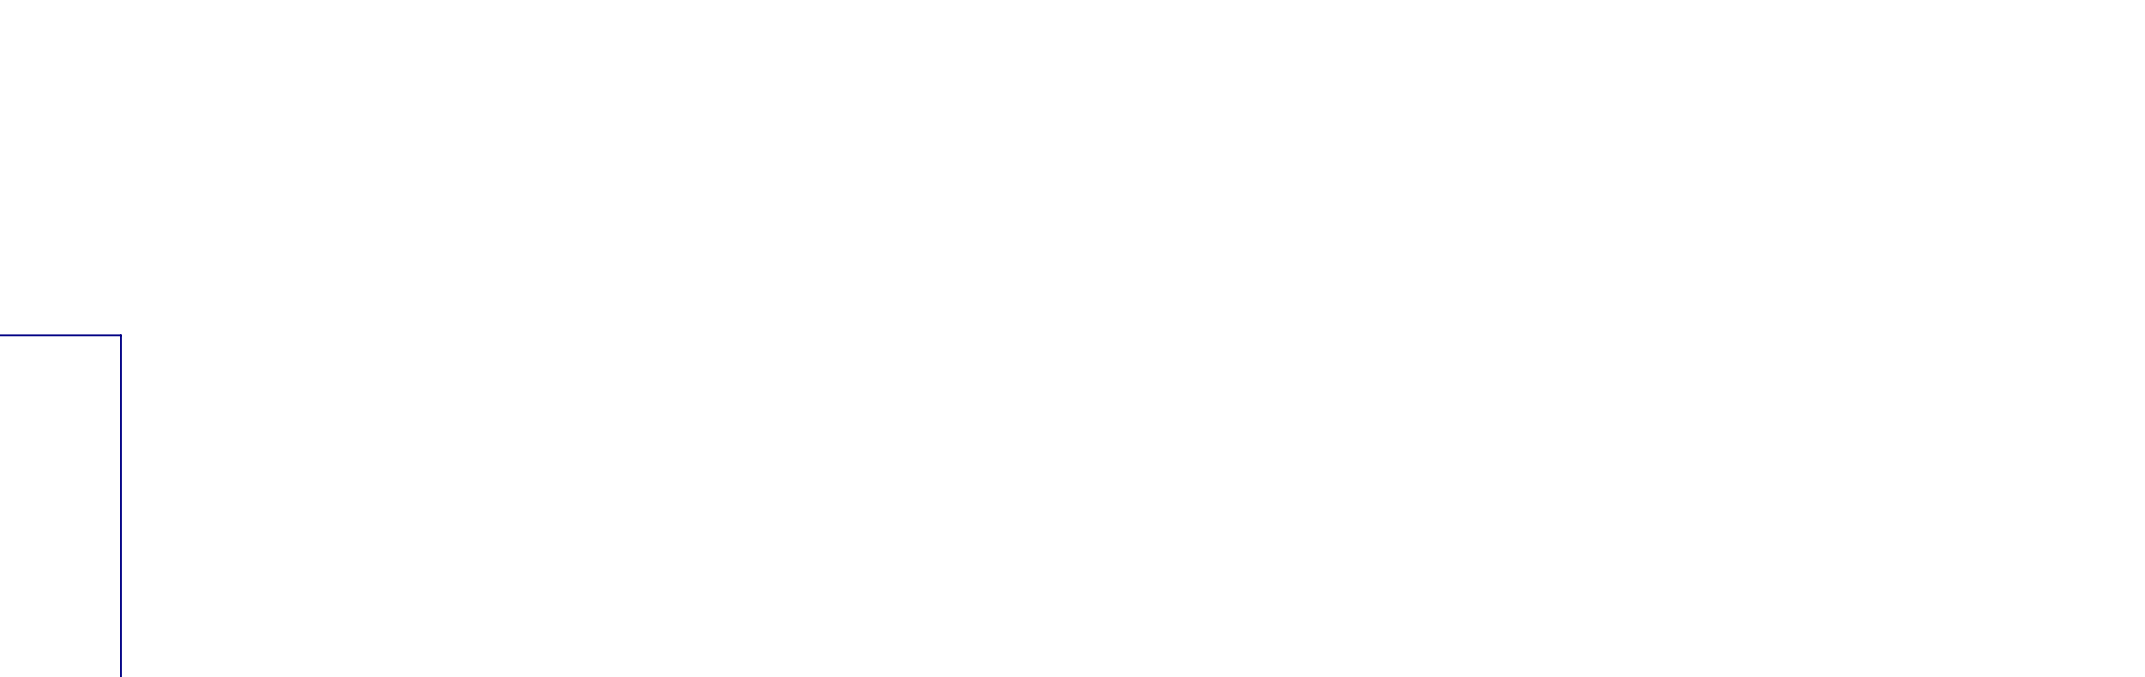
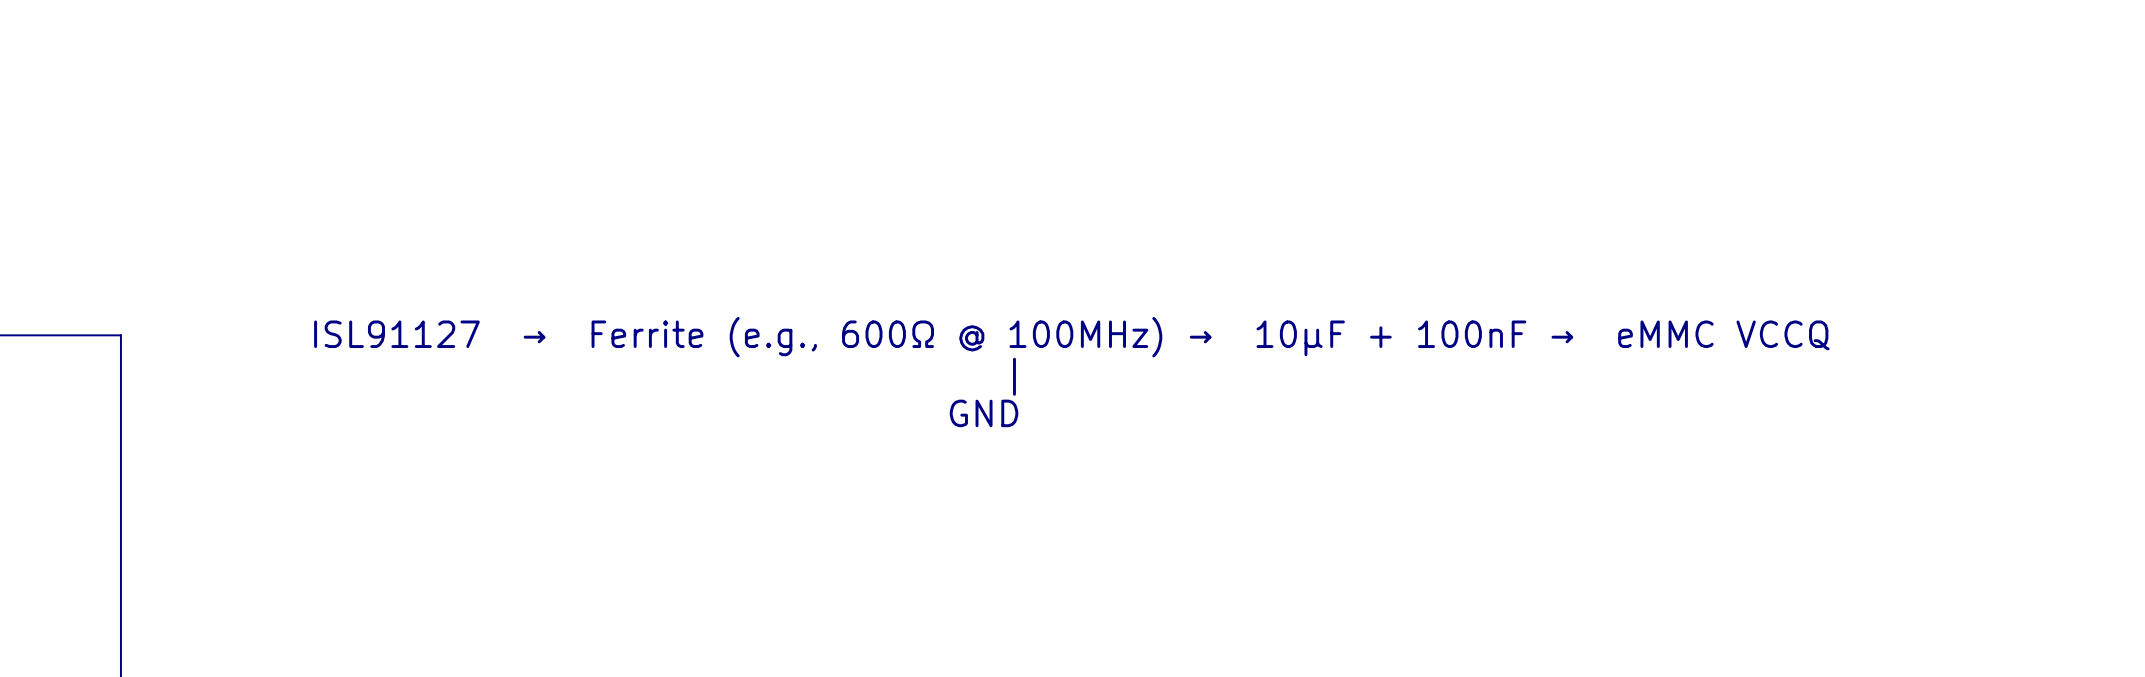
text: none -> ISL91127 → Ferrite (e.g., 600Ω @ 100MHz) → 10µF + 100nF → eMMC VCCQ (1071, 337)
text: none -> | (1014, 376)
text: none -> GND (984, 413)

